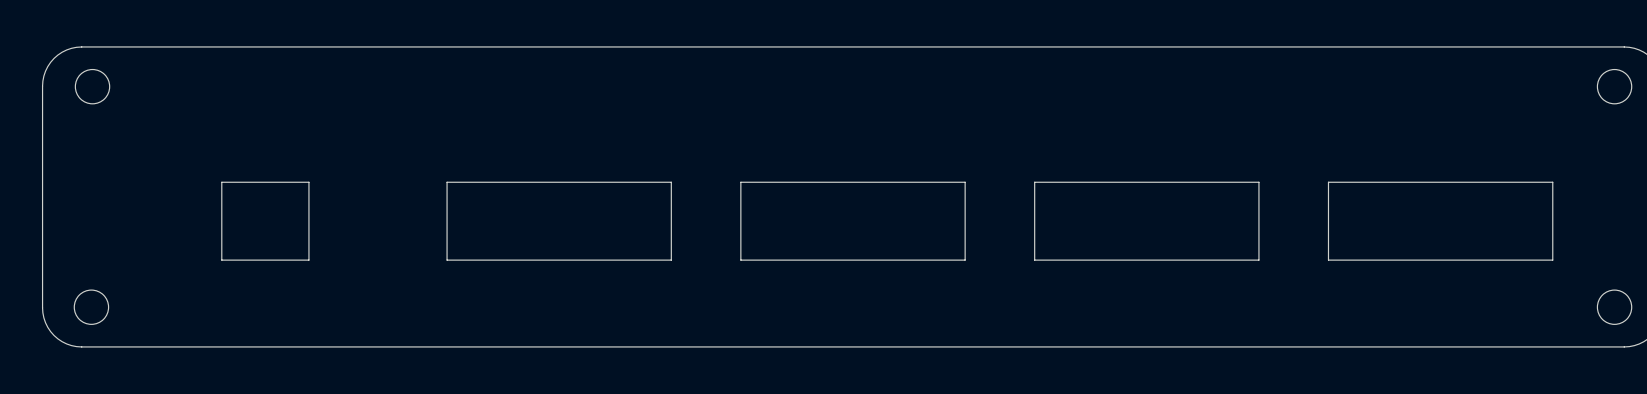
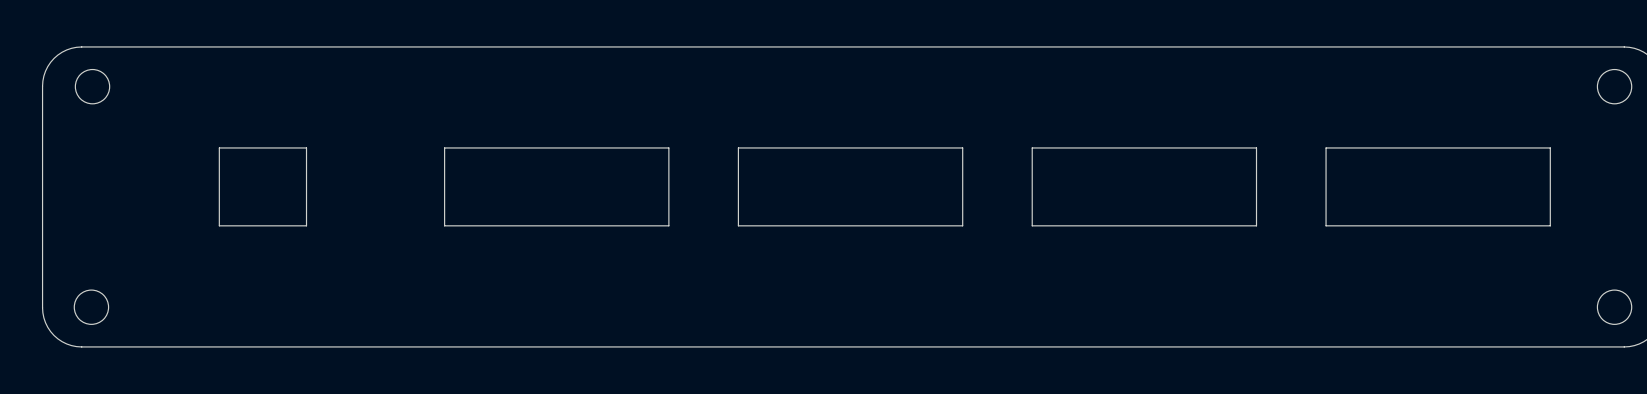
board edge: (308, 182) (221, 182) (221, 260) (308, 260) (308, 182) -> (306, 147) (219, 147) (219, 225) (306, 225) (306, 147)
board edge: (671, 182) (447, 182) (447, 260) (671, 260) (671, 182) -> (668, 147) (444, 147) (444, 225) (668, 225) (668, 147)
board edge: (965, 182) (740, 182) (740, 260) (965, 260) (965, 182) -> (962, 147) (738, 147) (738, 225) (962, 225) (962, 147)
board edge: (1258, 182) (1258, 260) (1034, 260) (1034, 182) (1258, 182) -> (1256, 147) (1256, 225) (1032, 225) (1032, 147) (1256, 147)
board edge: (1552, 182) (1328, 182) (1328, 260) (1552, 260) (1552, 182) -> (1550, 147) (1326, 147) (1326, 225) (1550, 225) (1550, 147)

